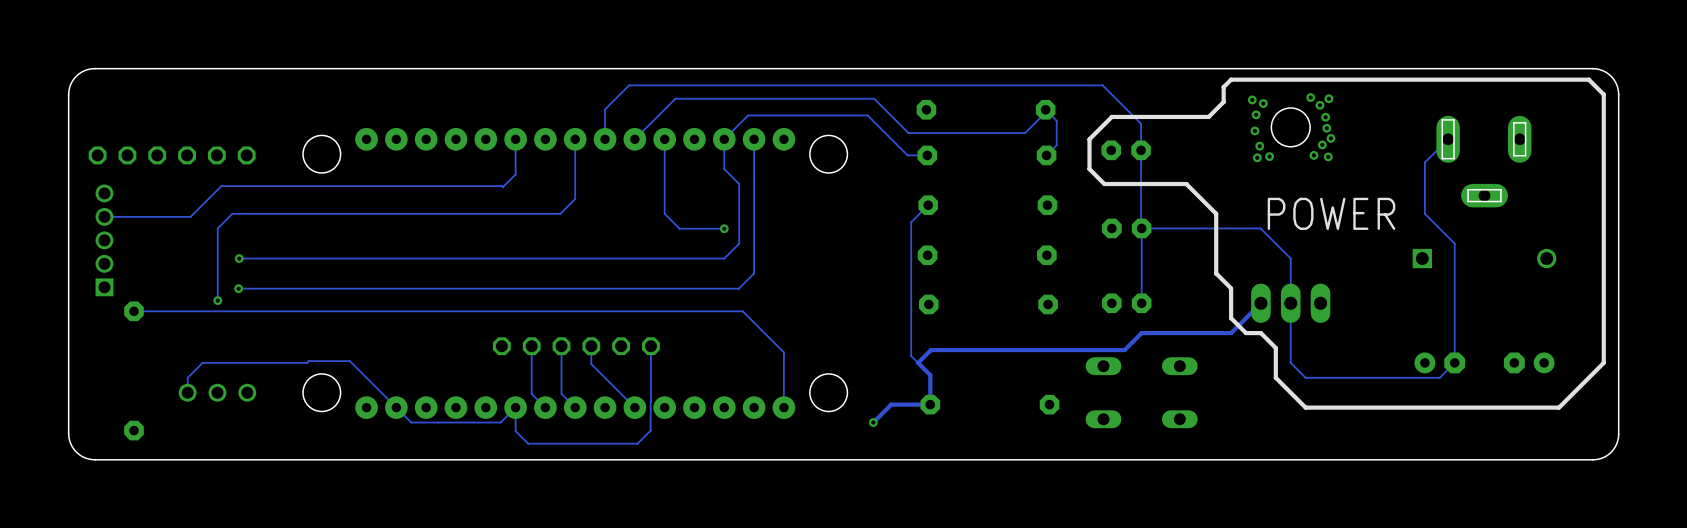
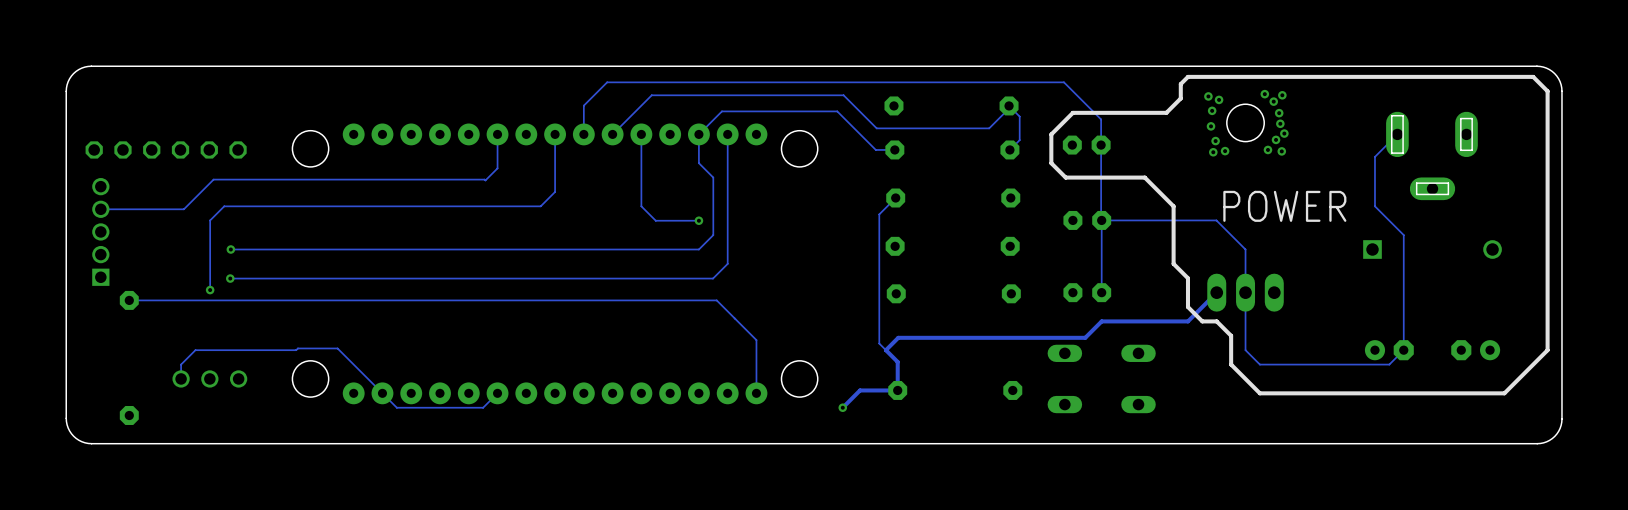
track: (531, 346) (531, 393) (545, 407) -> none
track: (561, 346) (561, 393) (575, 407) -> none
part: (576, 346) -> none
track: (591, 346) (591, 364) (634, 407) -> none
track: (650, 346) (650, 430) (637, 443) (528, 443) (515, 431) (515, 407) -> none

